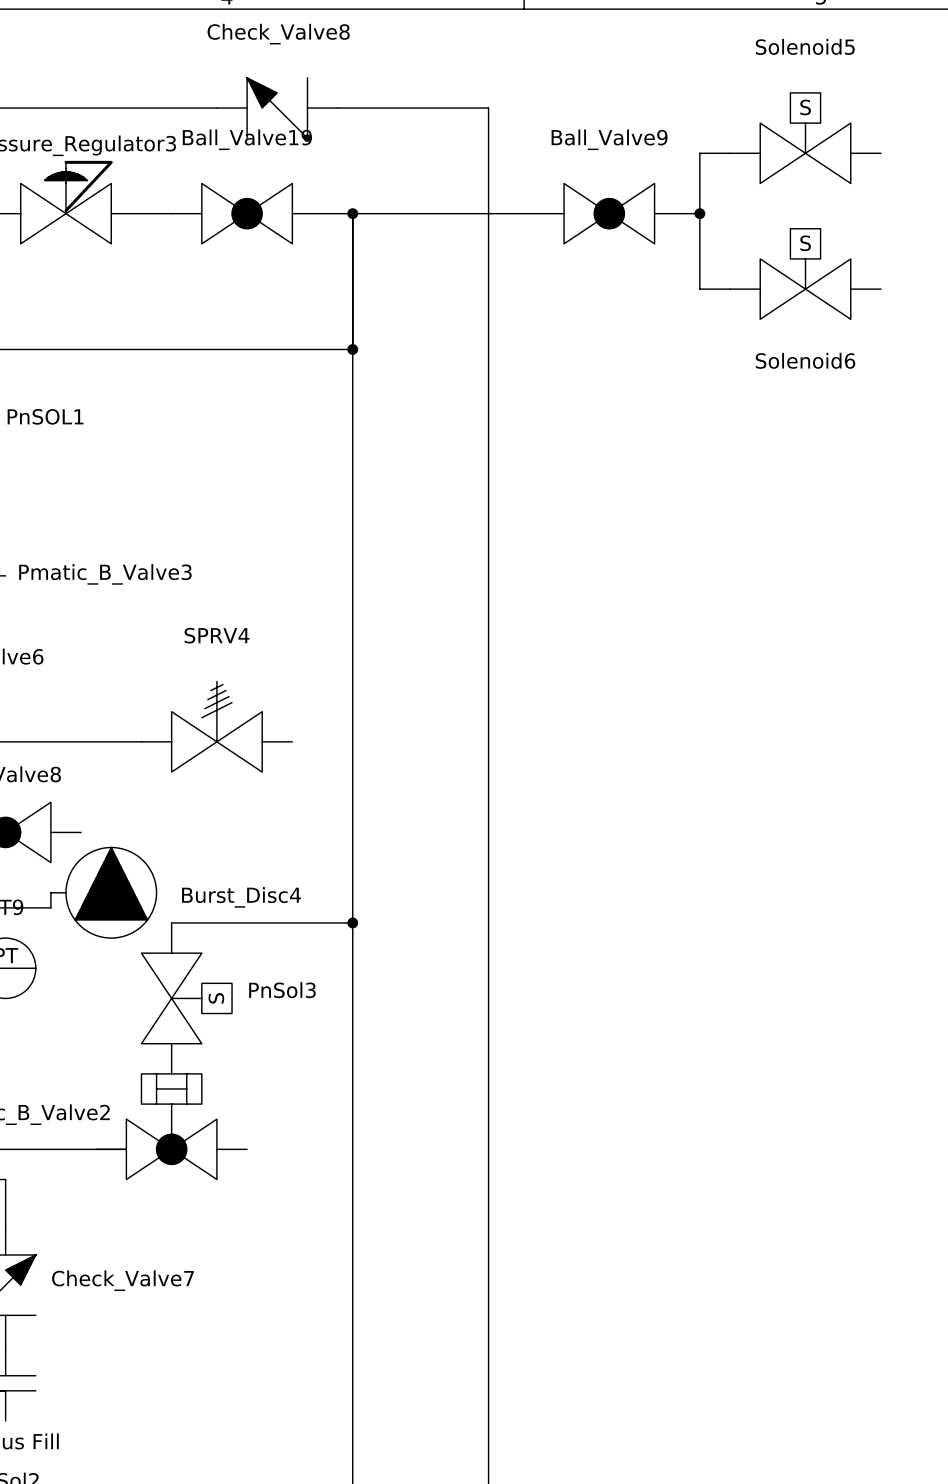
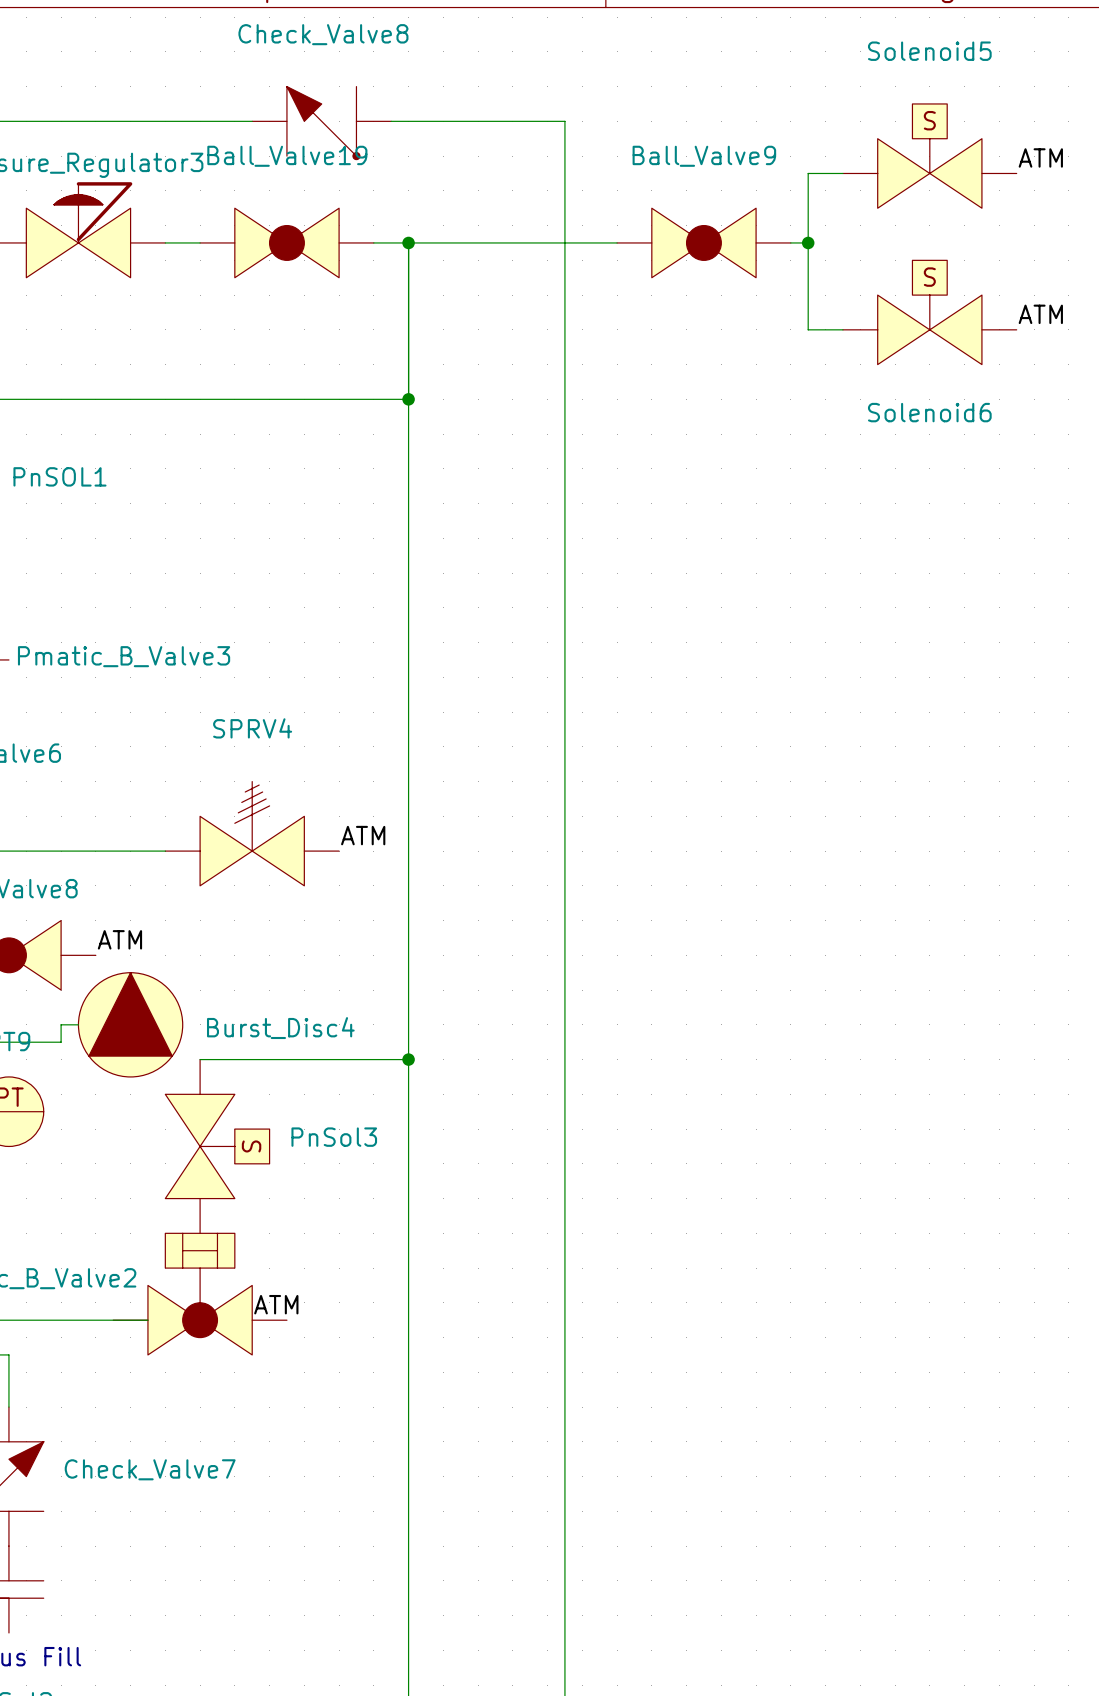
label: none -> ATM (1040, 157)
label: none -> ATM (1040, 314)
label: none -> ATM (363, 835)
label: none -> ATM (119, 939)
label: none -> ATM (276, 1304)

